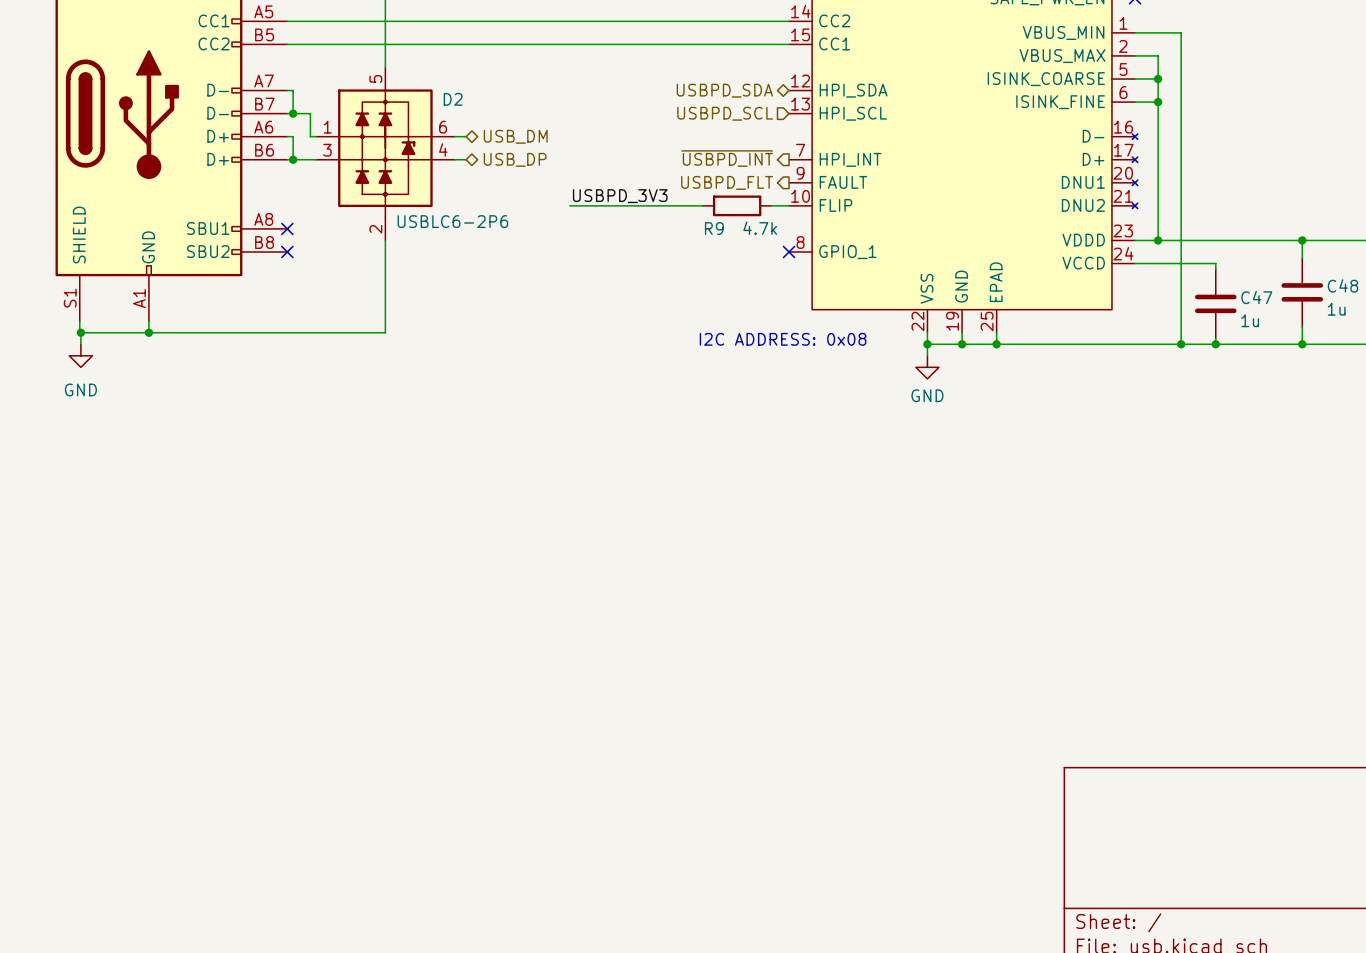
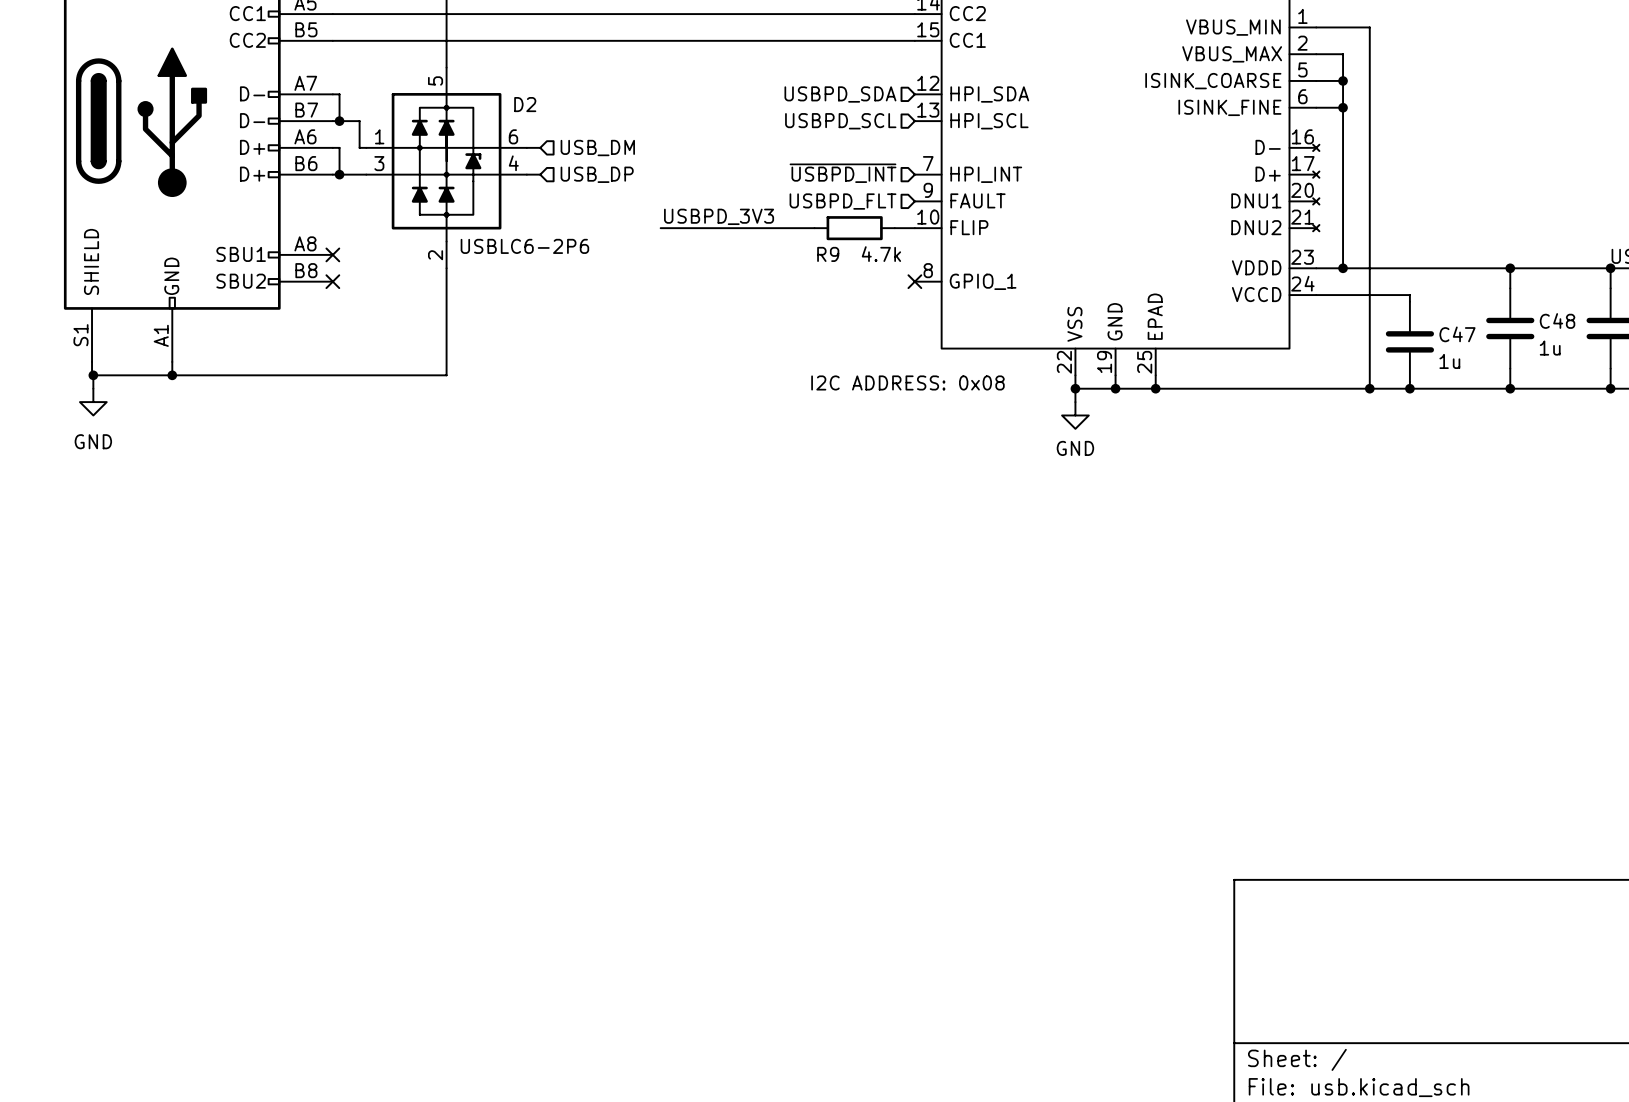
hierarchical label shape: bidirectional (724, 90) -> input (840, 94)
hierarchical label shape: bidirectional (515, 136) -> input (597, 148)
hierarchical label shape: output (727, 158) -> input (843, 173)
hierarchical label shape: bidirectional (515, 159) -> input (597, 174)
hierarchical label shape: output (727, 182) -> input (842, 201)

